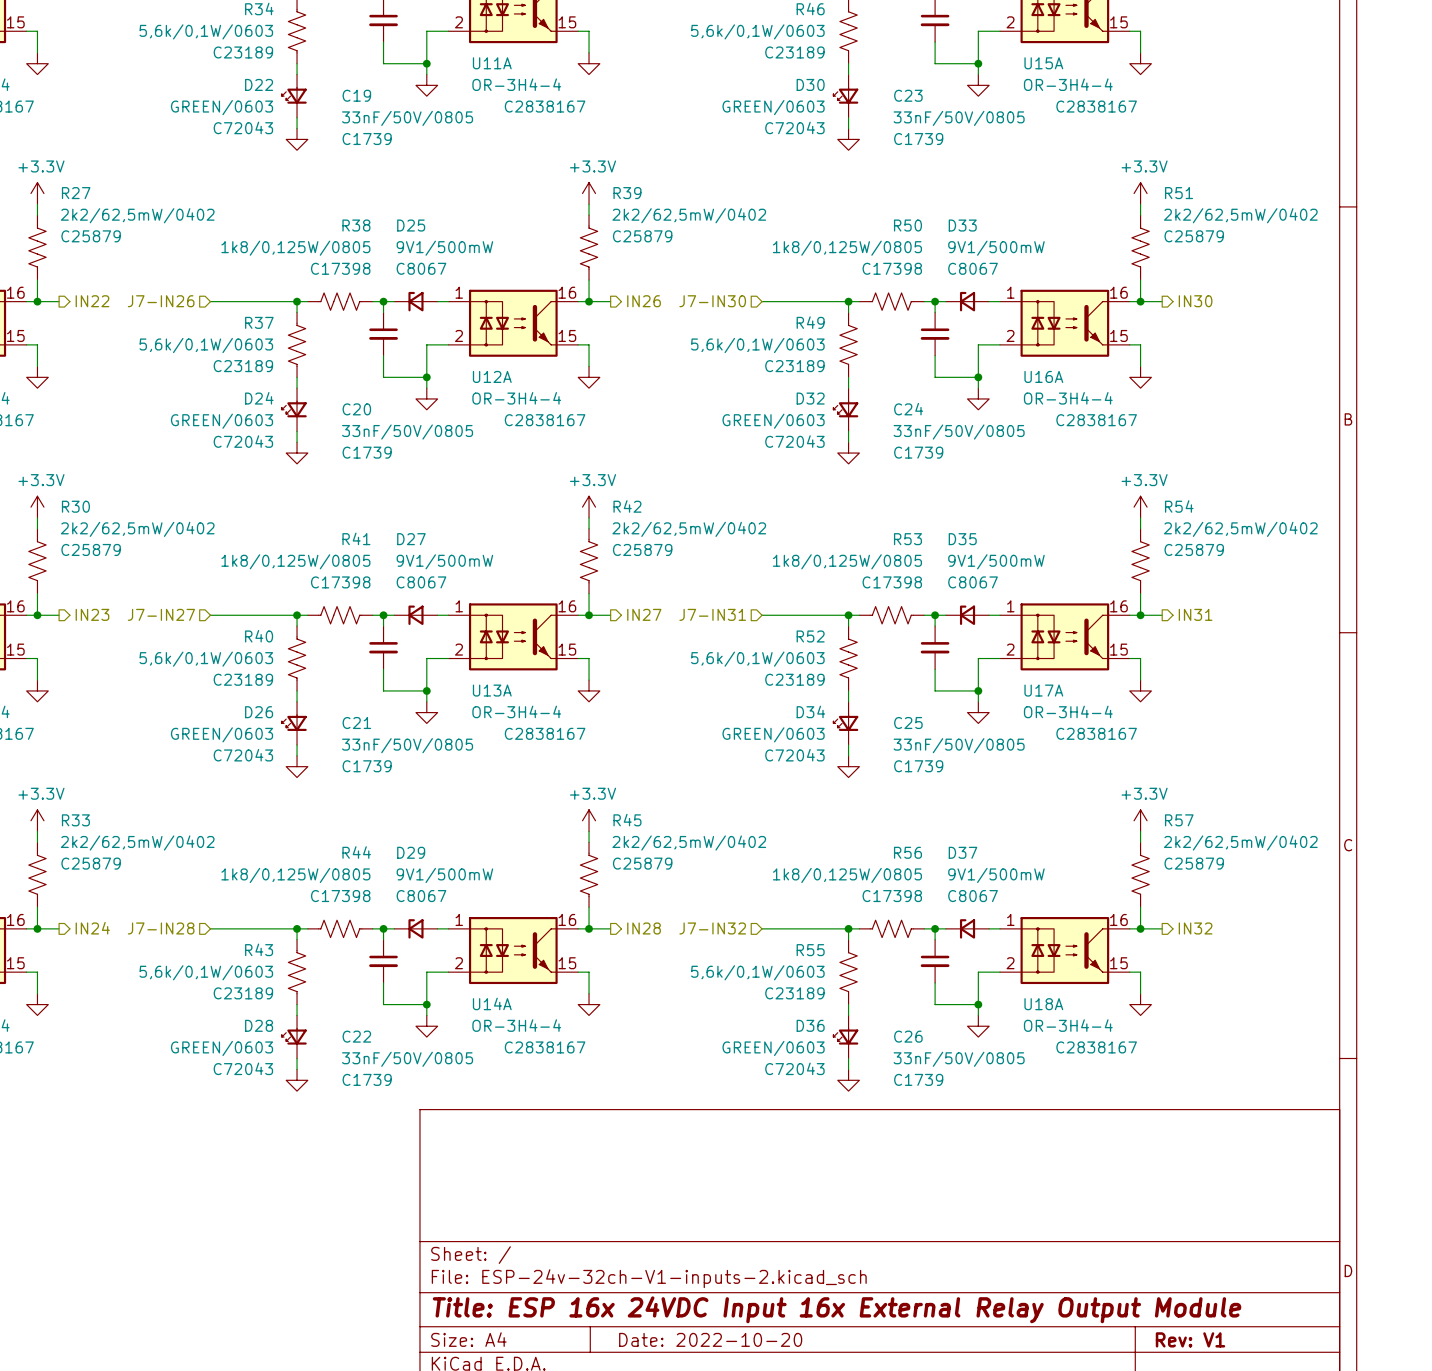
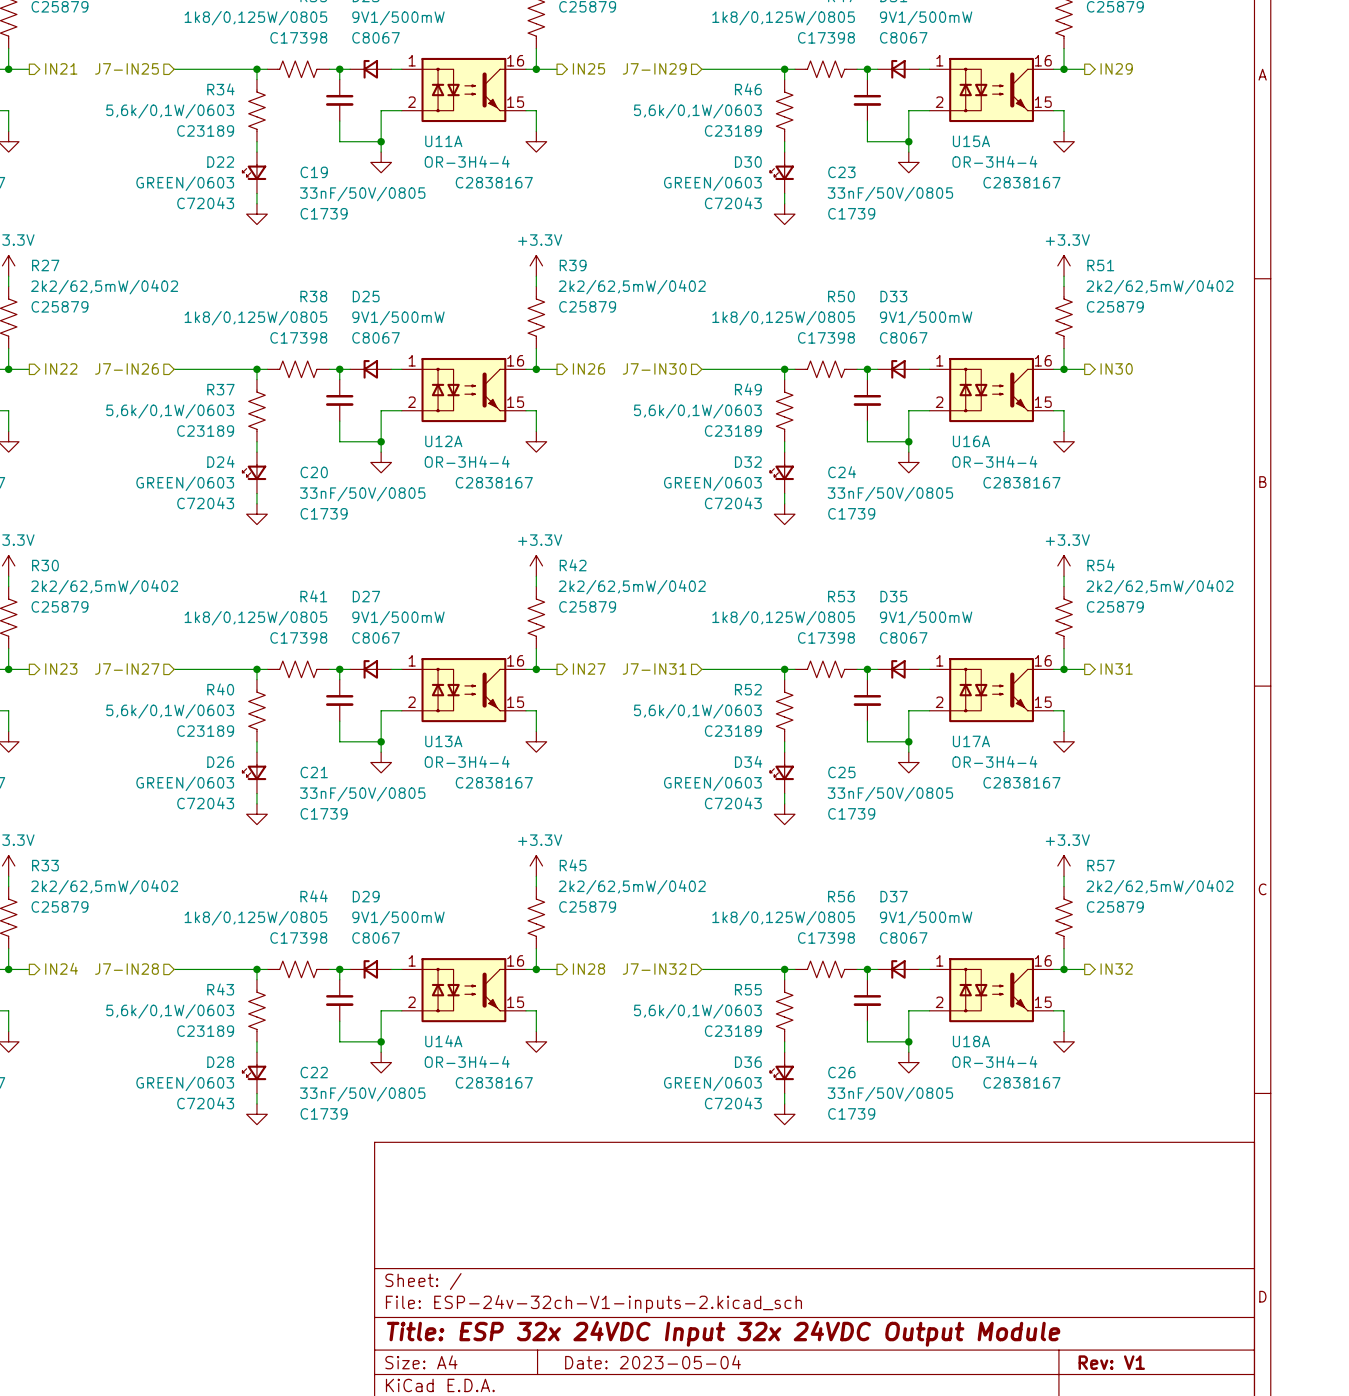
title block: Title: ESP 16x 24VDC Input 16x External Relay Output Module (837, 1309) -> Title: ESP 32x 24VDC Input 32x 24VDC Output Module (723, 1333)
title block: Date: 2022-10-20 (710, 1339) -> Date: 2023-05-04 (653, 1362)

